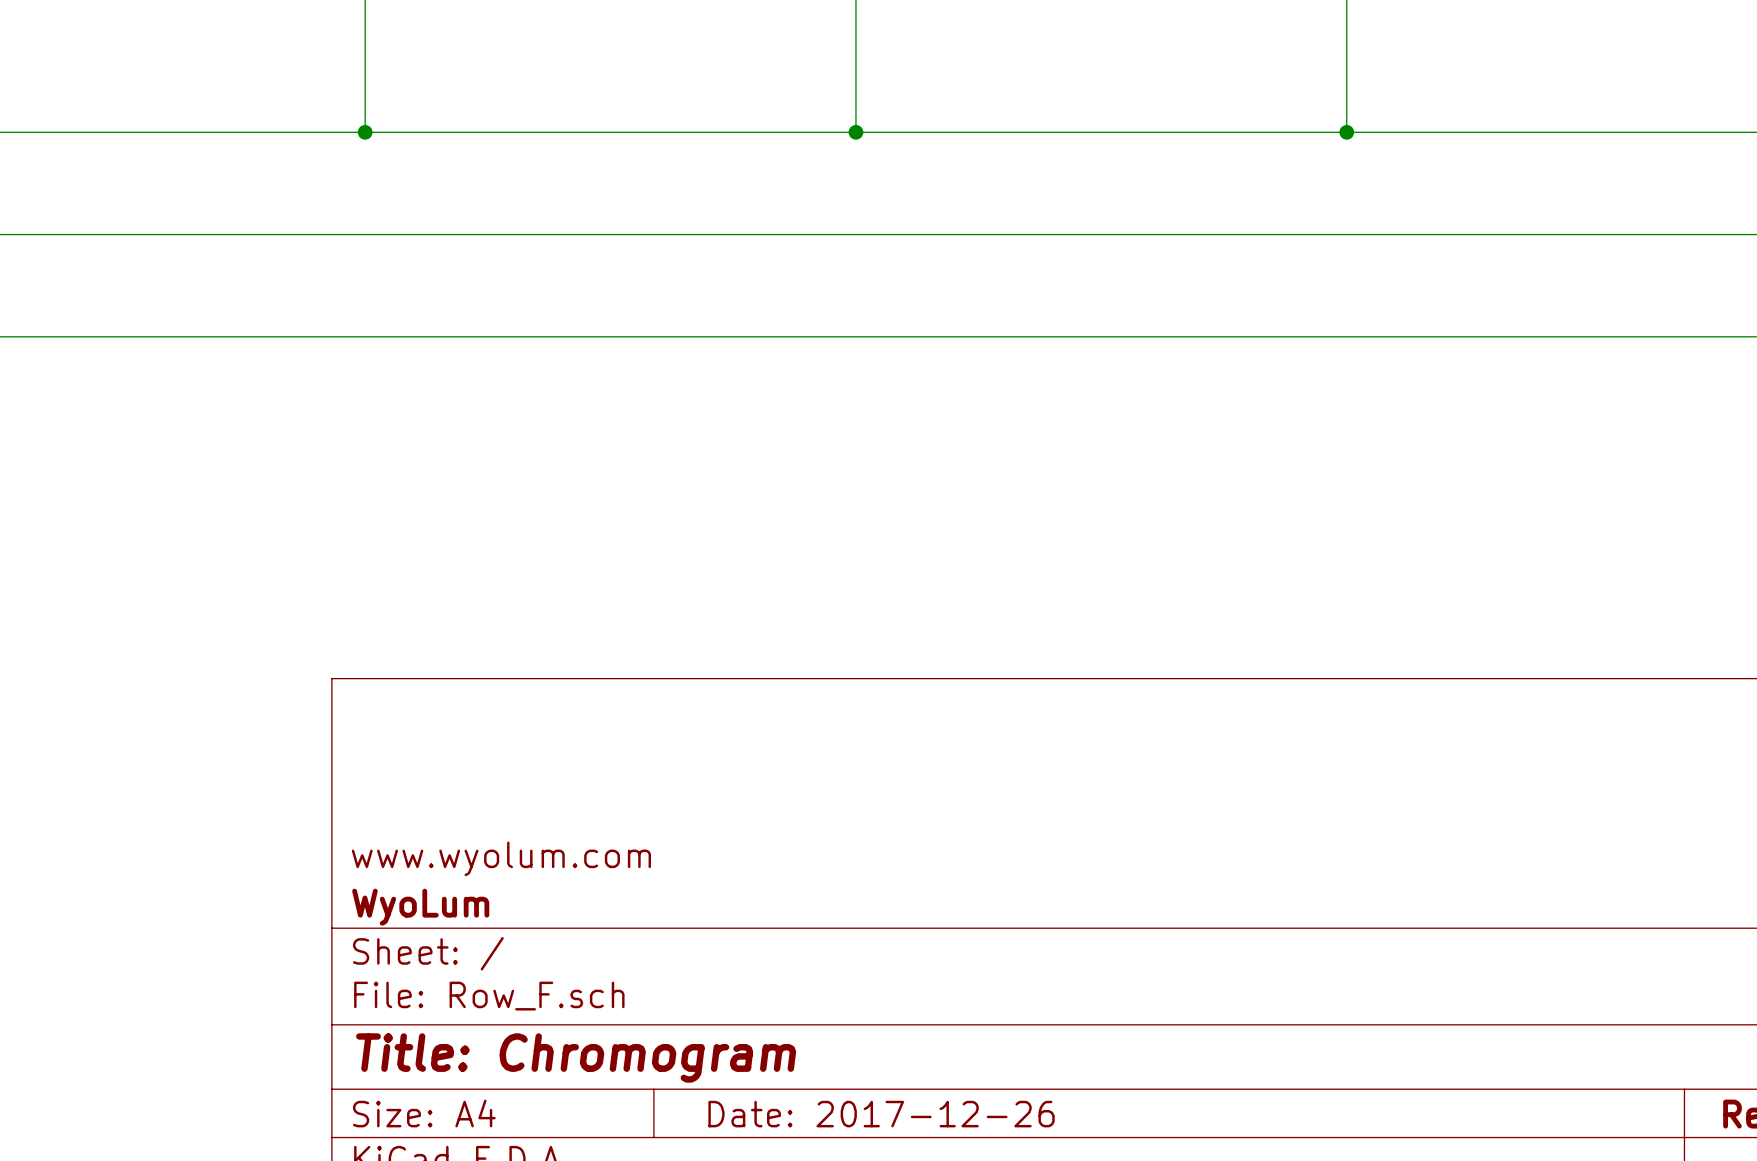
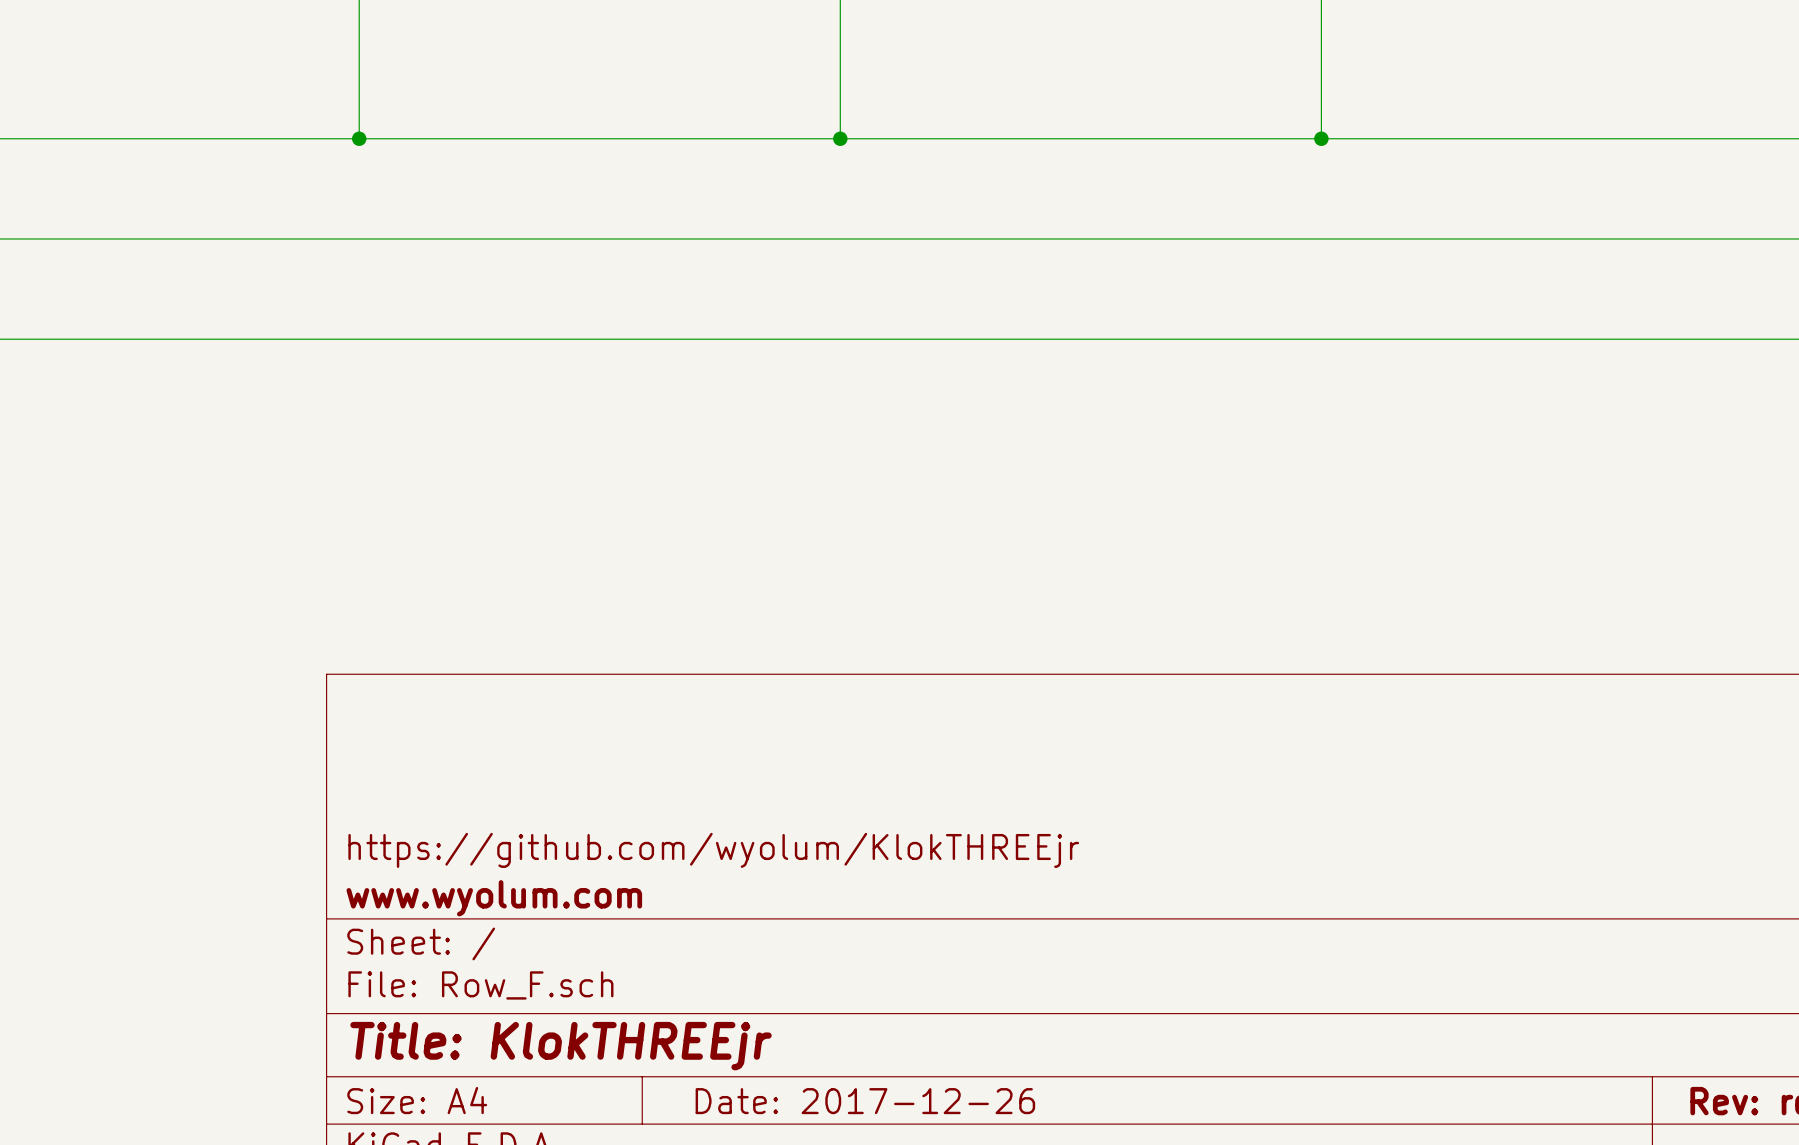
title block: www.wyolum.com (501, 858) -> https://github.com/wyolum/KlokTHREEjr (713, 850)
title block: WyoLum (420, 907) -> www.wyolum.com (494, 898)
title block: Title: Chromogram (576, 1057) -> Title: KlokTHREEjr (561, 1046)

